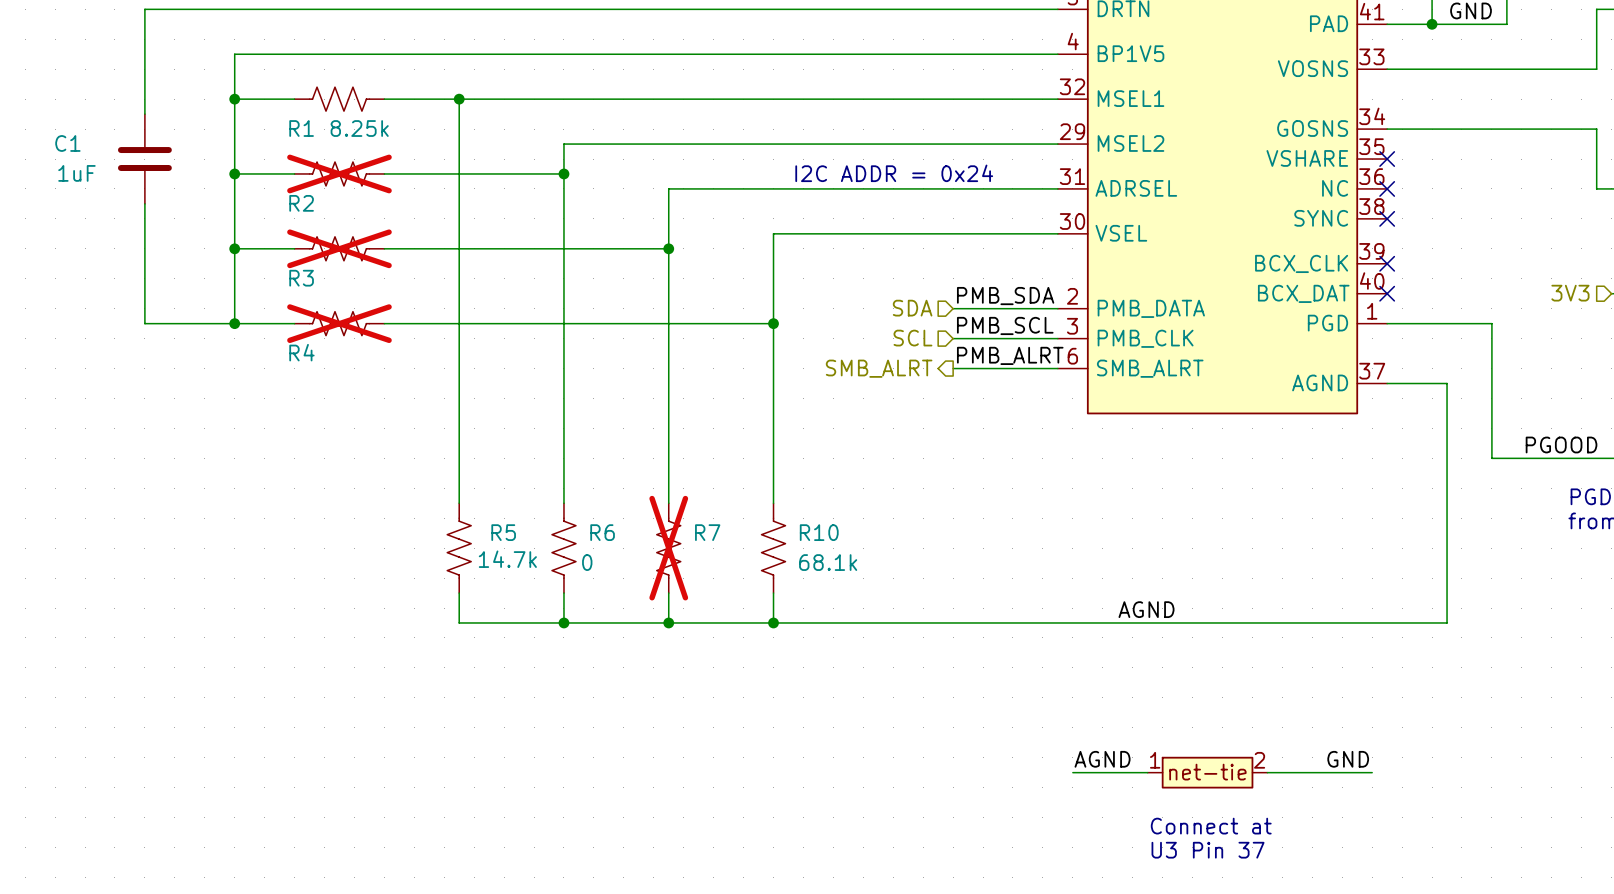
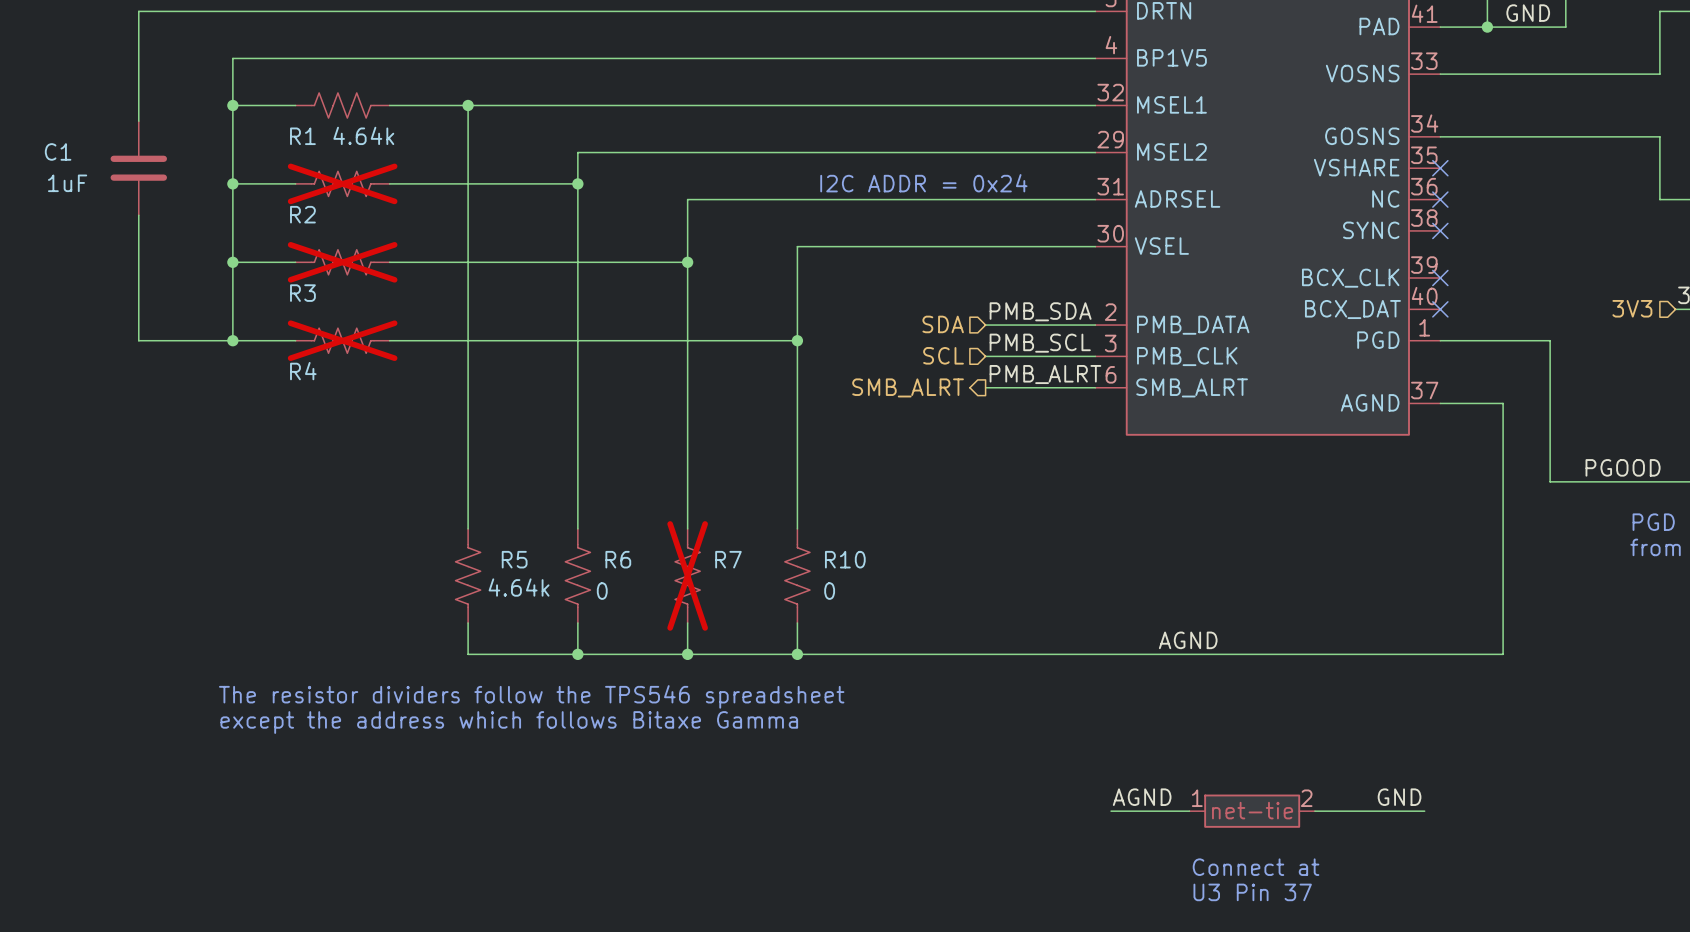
R1 value: 8.25k (359, 128) -> 4.64k (363, 135)
R5 value: 14.7k (507, 559) -> 4.64k (519, 587)
R10 value: 68.1k (828, 562) -> 0 (829, 591)
text: none -> The resistor dividers follow the TPS546 spreadsheet (531, 696)
text: none -> except the address which follows Bitaxe Gamma (509, 722)

